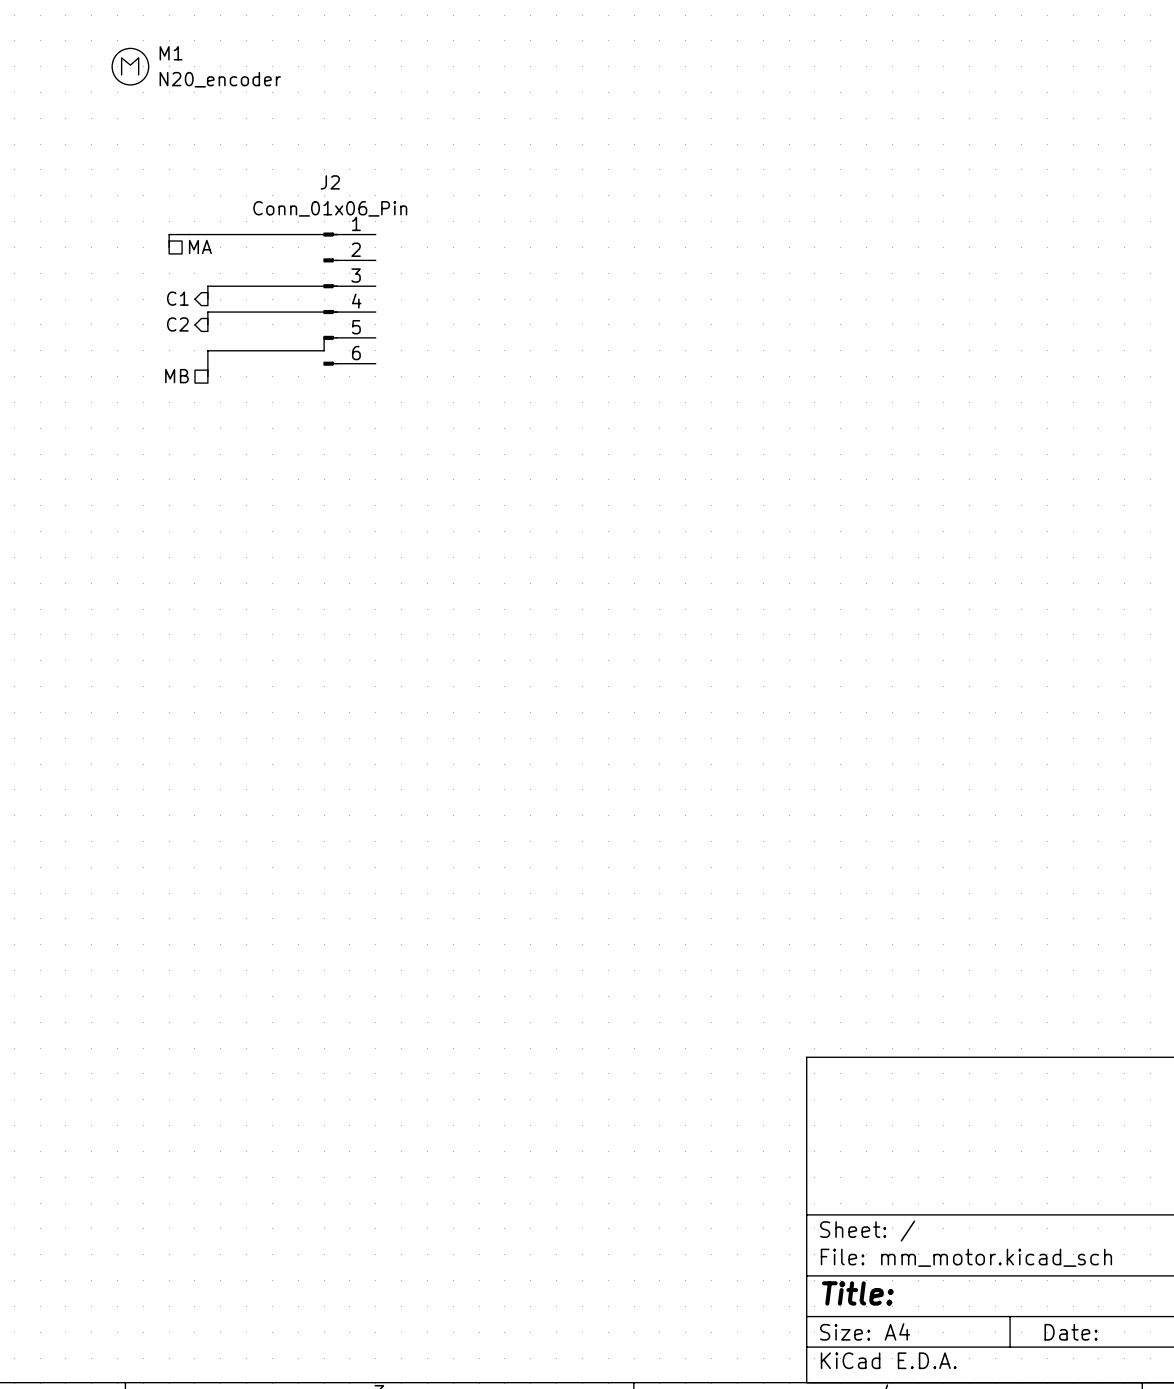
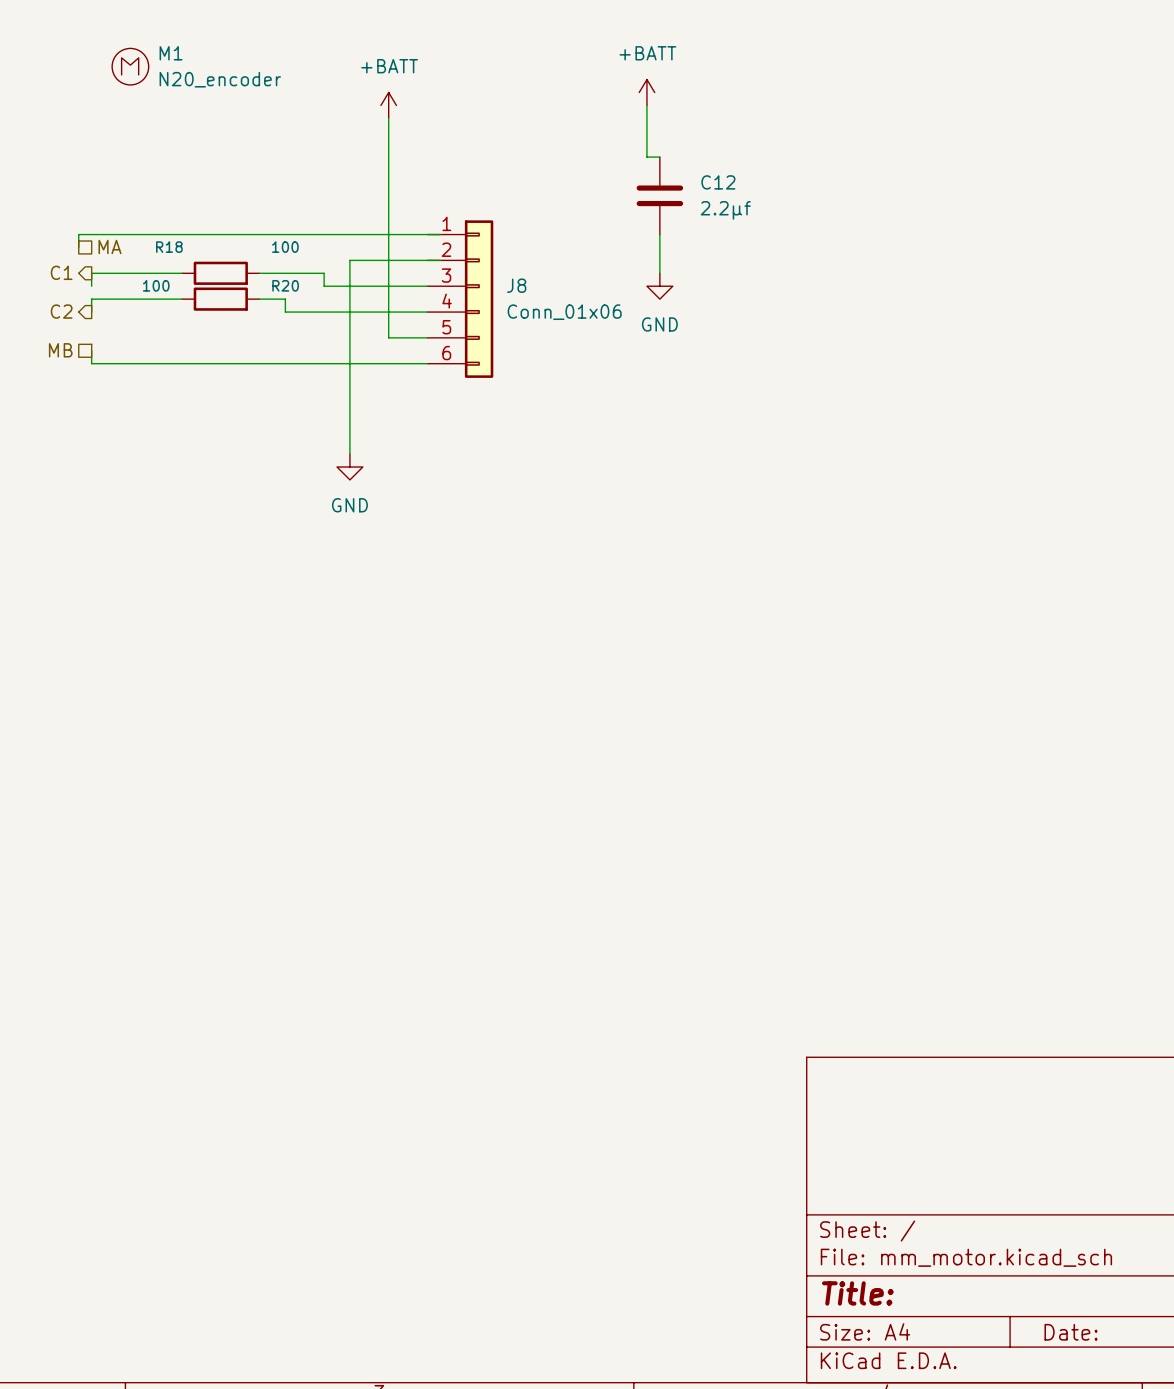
power symbol: none -> +BATT (646, 92)
power symbol: none -> +BATT (388, 105)
wire: none -> (646, 105) (646, 157) (659, 157)
wire: none -> (388, 118) (388, 337) (427, 337)
C12: none -> 2.2µf (659, 195)
wire: (169, 234) (169, 247) -> (169, 234) (78, 234) (78, 247)
wire: none -> (337, 234) (440, 234)
wire: none -> (659, 234) (659, 273)
hierarchical label position: MA (200, 246) -> MA (110, 246)
wire: none -> (440, 260) (349, 260) (349, 454)
wire: none -> (182, 273) (91, 273) (91, 286)
R18: none -> 100 (220, 273)
wire: (324, 286) (207, 286) (207, 299) -> (324, 286) (324, 273) (259, 273)
wire: none -> (337, 286) (427, 286)
power symbol: none -> GND (659, 286)
hierarchical label position: C1 (177, 298) -> C1 (61, 272)
wire: none -> (182, 299) (91, 299) (91, 312)
R20: none -> 100 (220, 299)
J2: Conn_01x06_Pin (349, 299) -> none
J8: none -> Conn_01x06 (460, 299)
wire: (285, 312) (207, 312) (207, 324) -> (285, 312) (285, 299) (259, 299)
wire: none -> (337, 312) (427, 312)
hierarchical label position: C2 (177, 324) -> C2 (61, 311)
wire: (324, 337) (324, 350) (207, 350) (207, 376) -> none
wire: none -> (91, 350) (91, 363) (427, 363)
hierarchical label position: MB (176, 376) -> MB (60, 350)
power symbol: none -> GND (349, 467)

